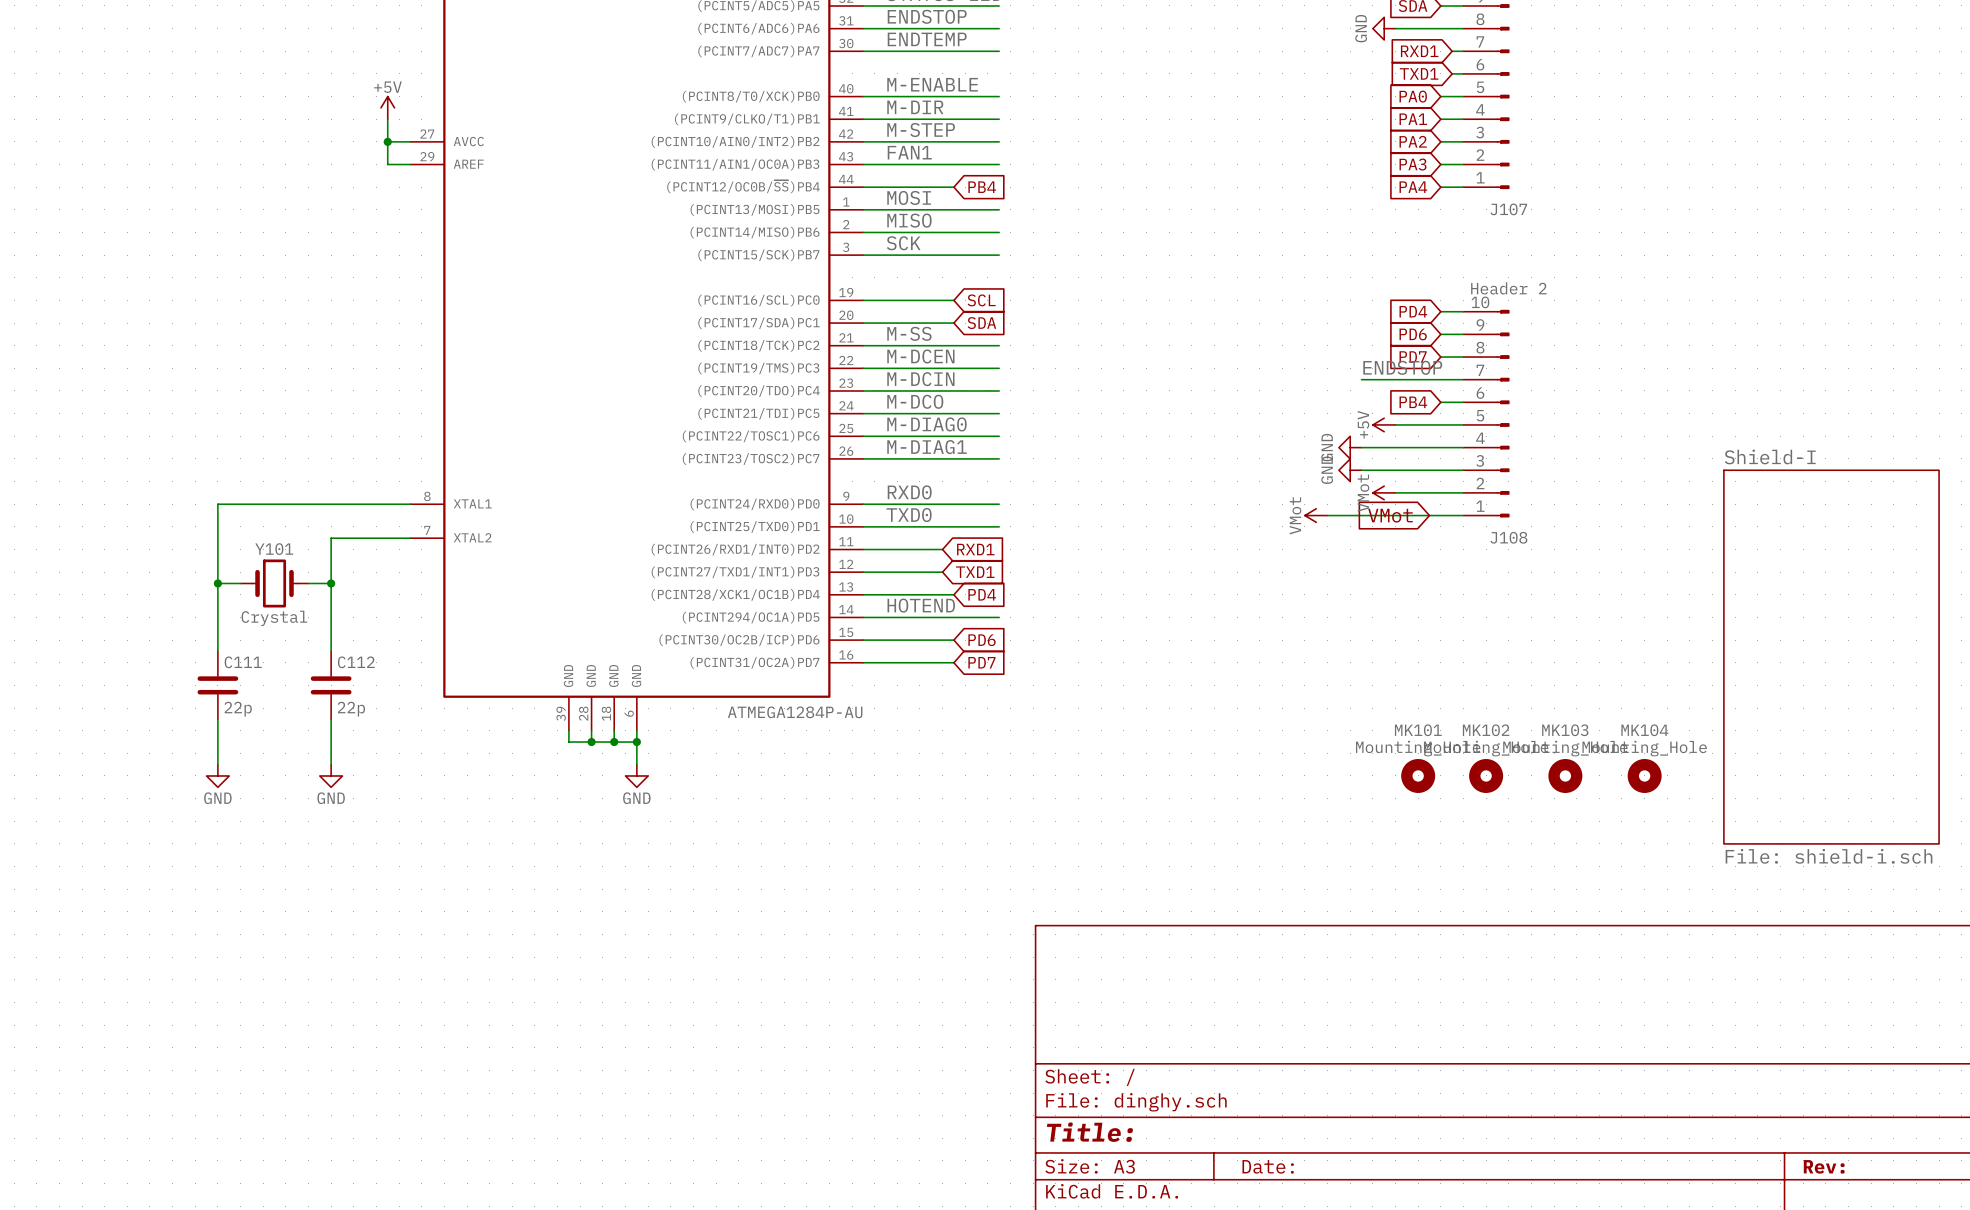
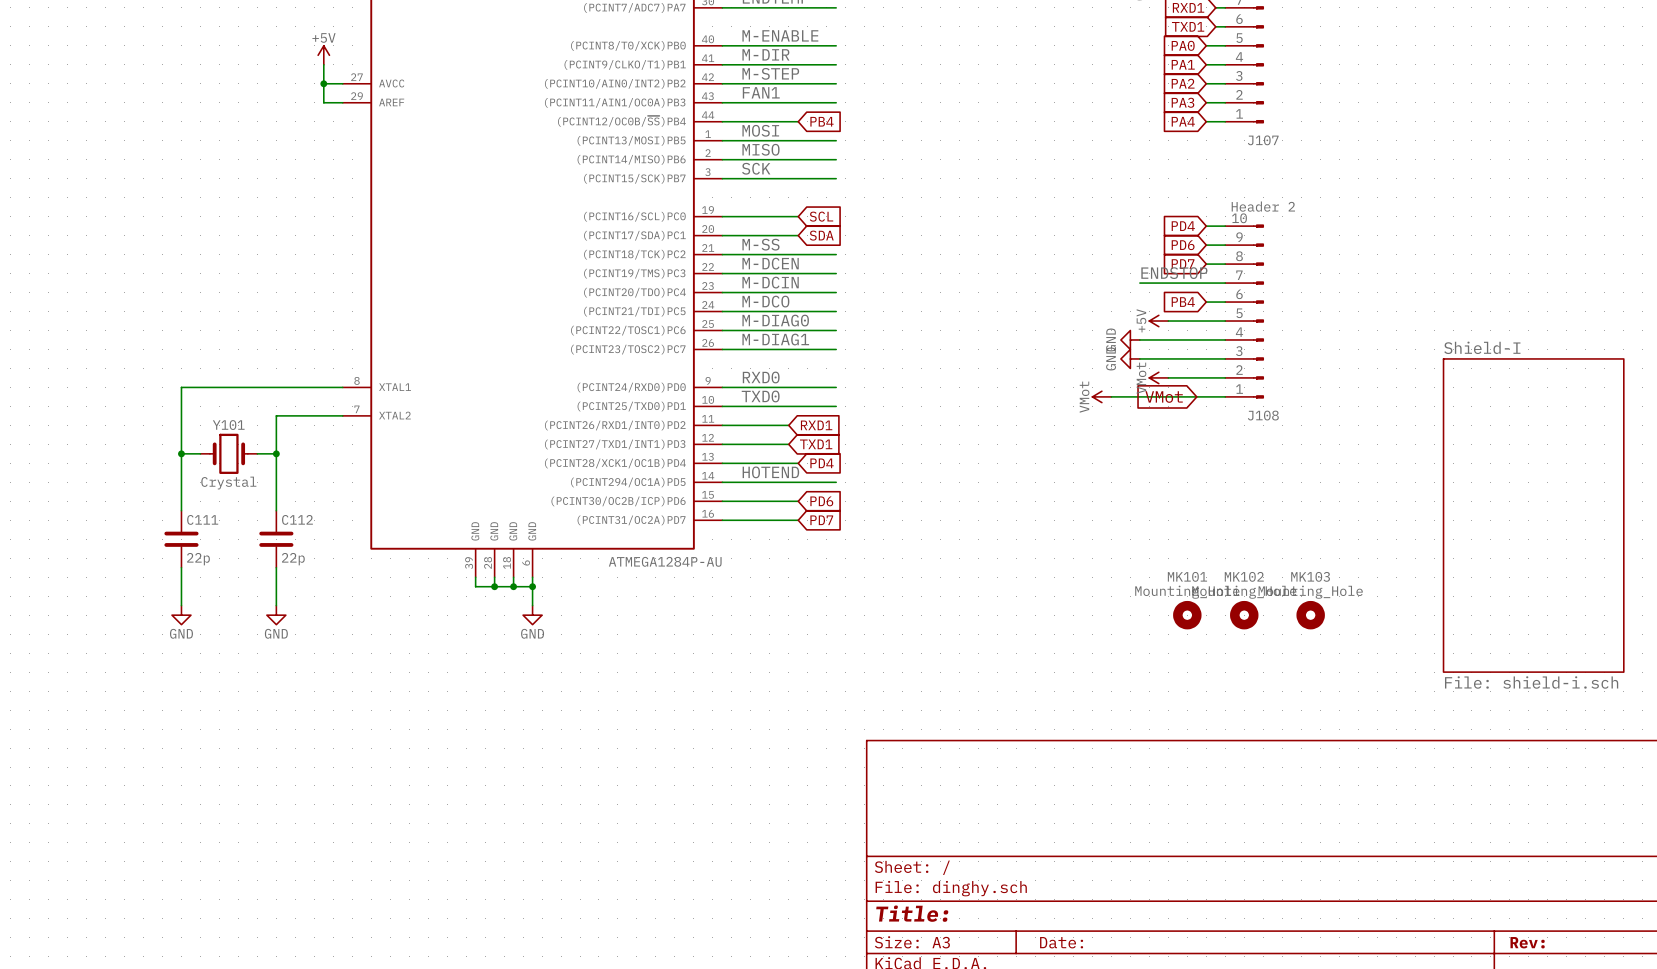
MK104: Mounting_Hole (1644, 775) -> none

